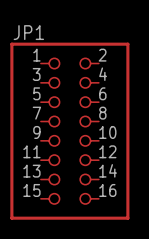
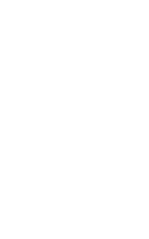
JP1: (69, 131) -> none

